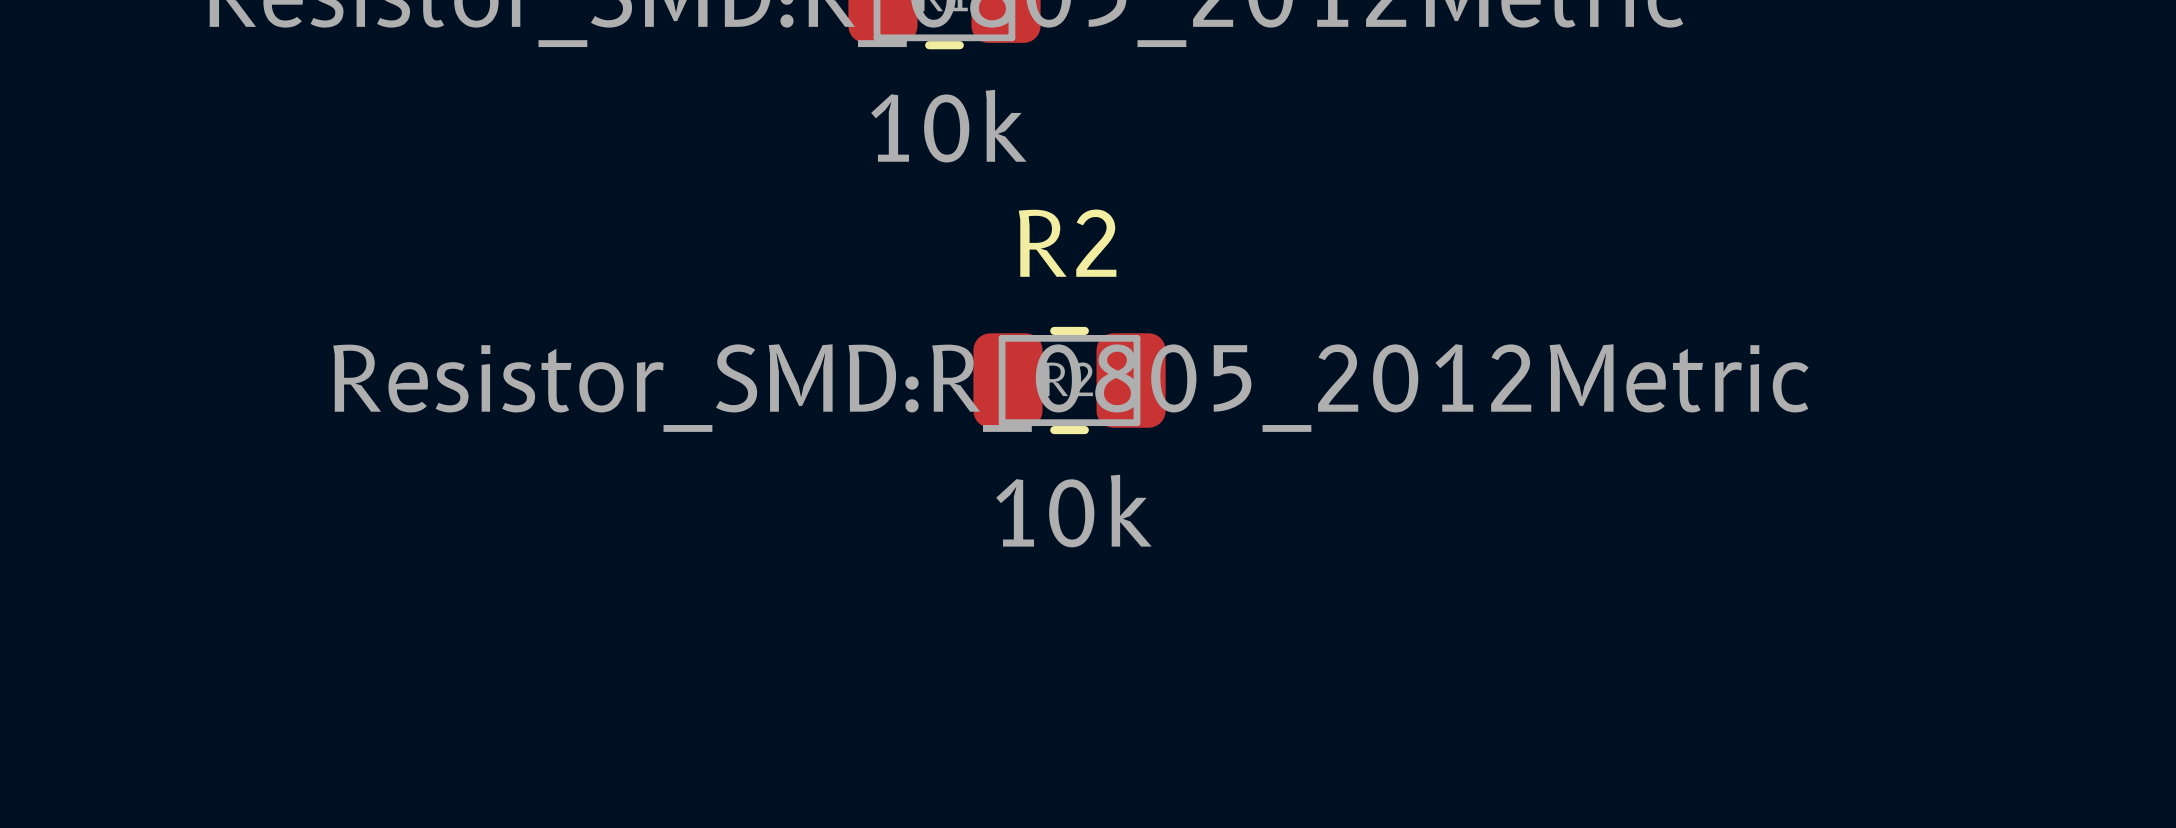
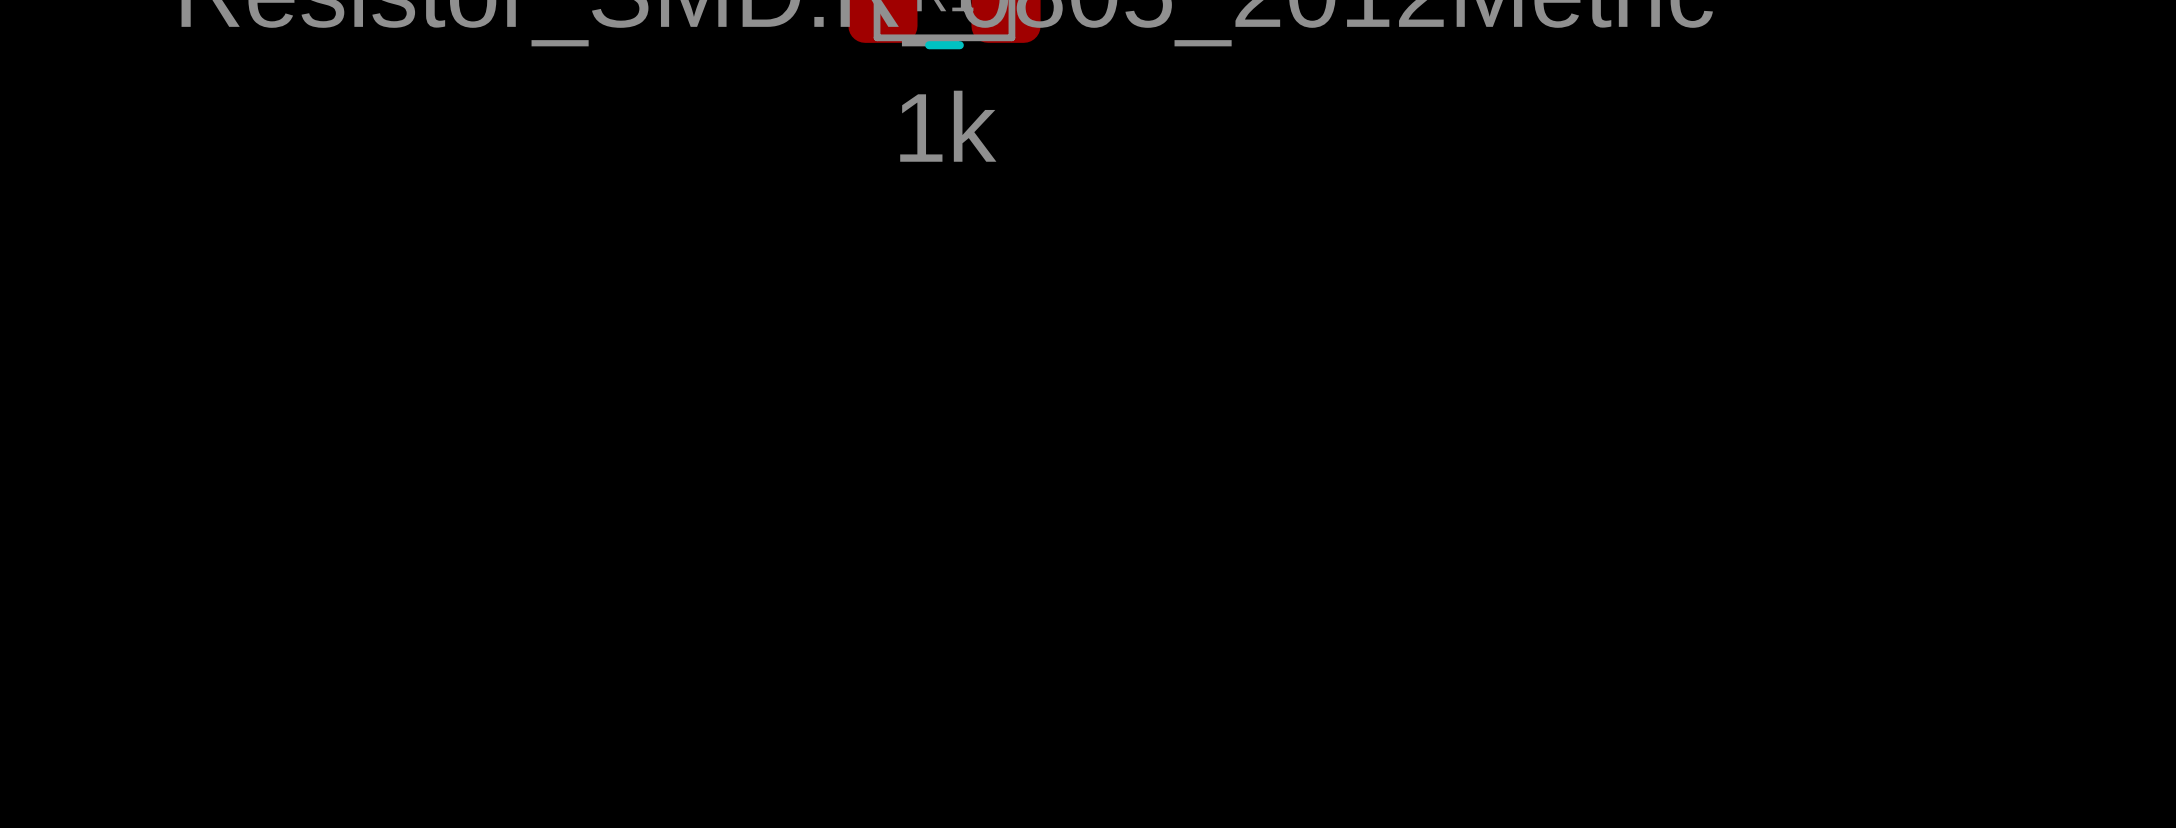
part value: 10k (948, 126) -> 1k (948, 126)
R2: 10k (1069, 380) -> none

